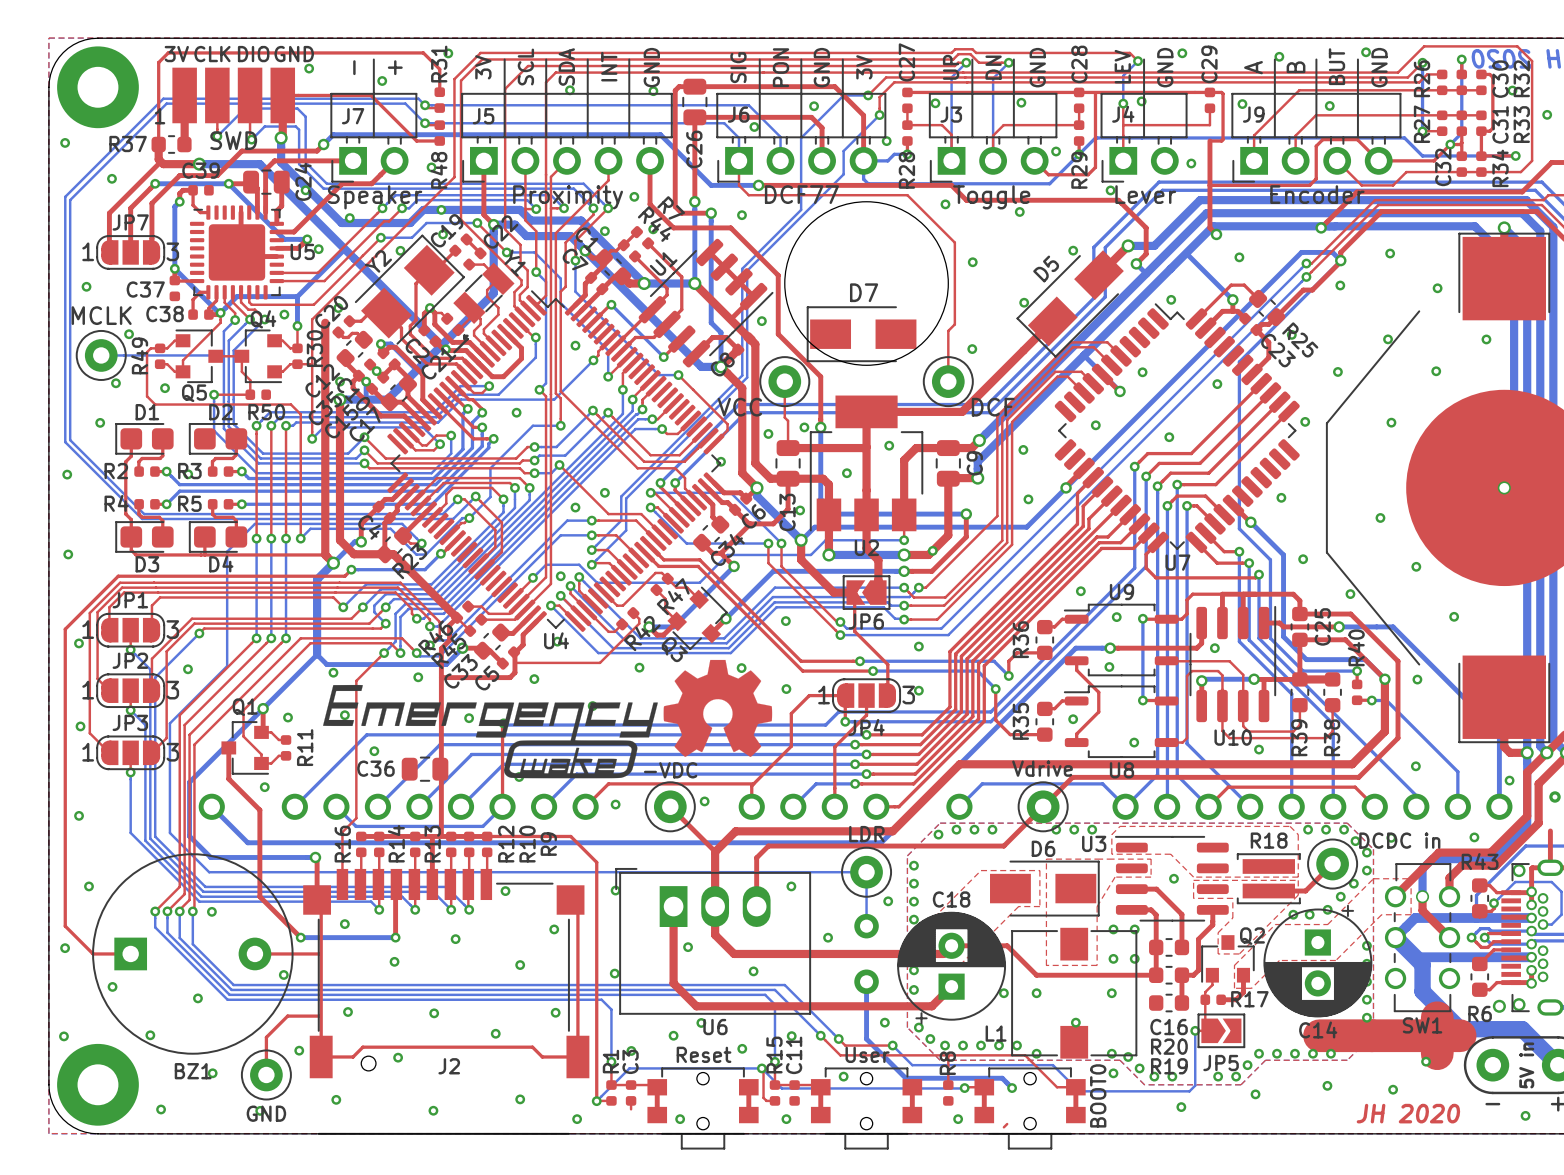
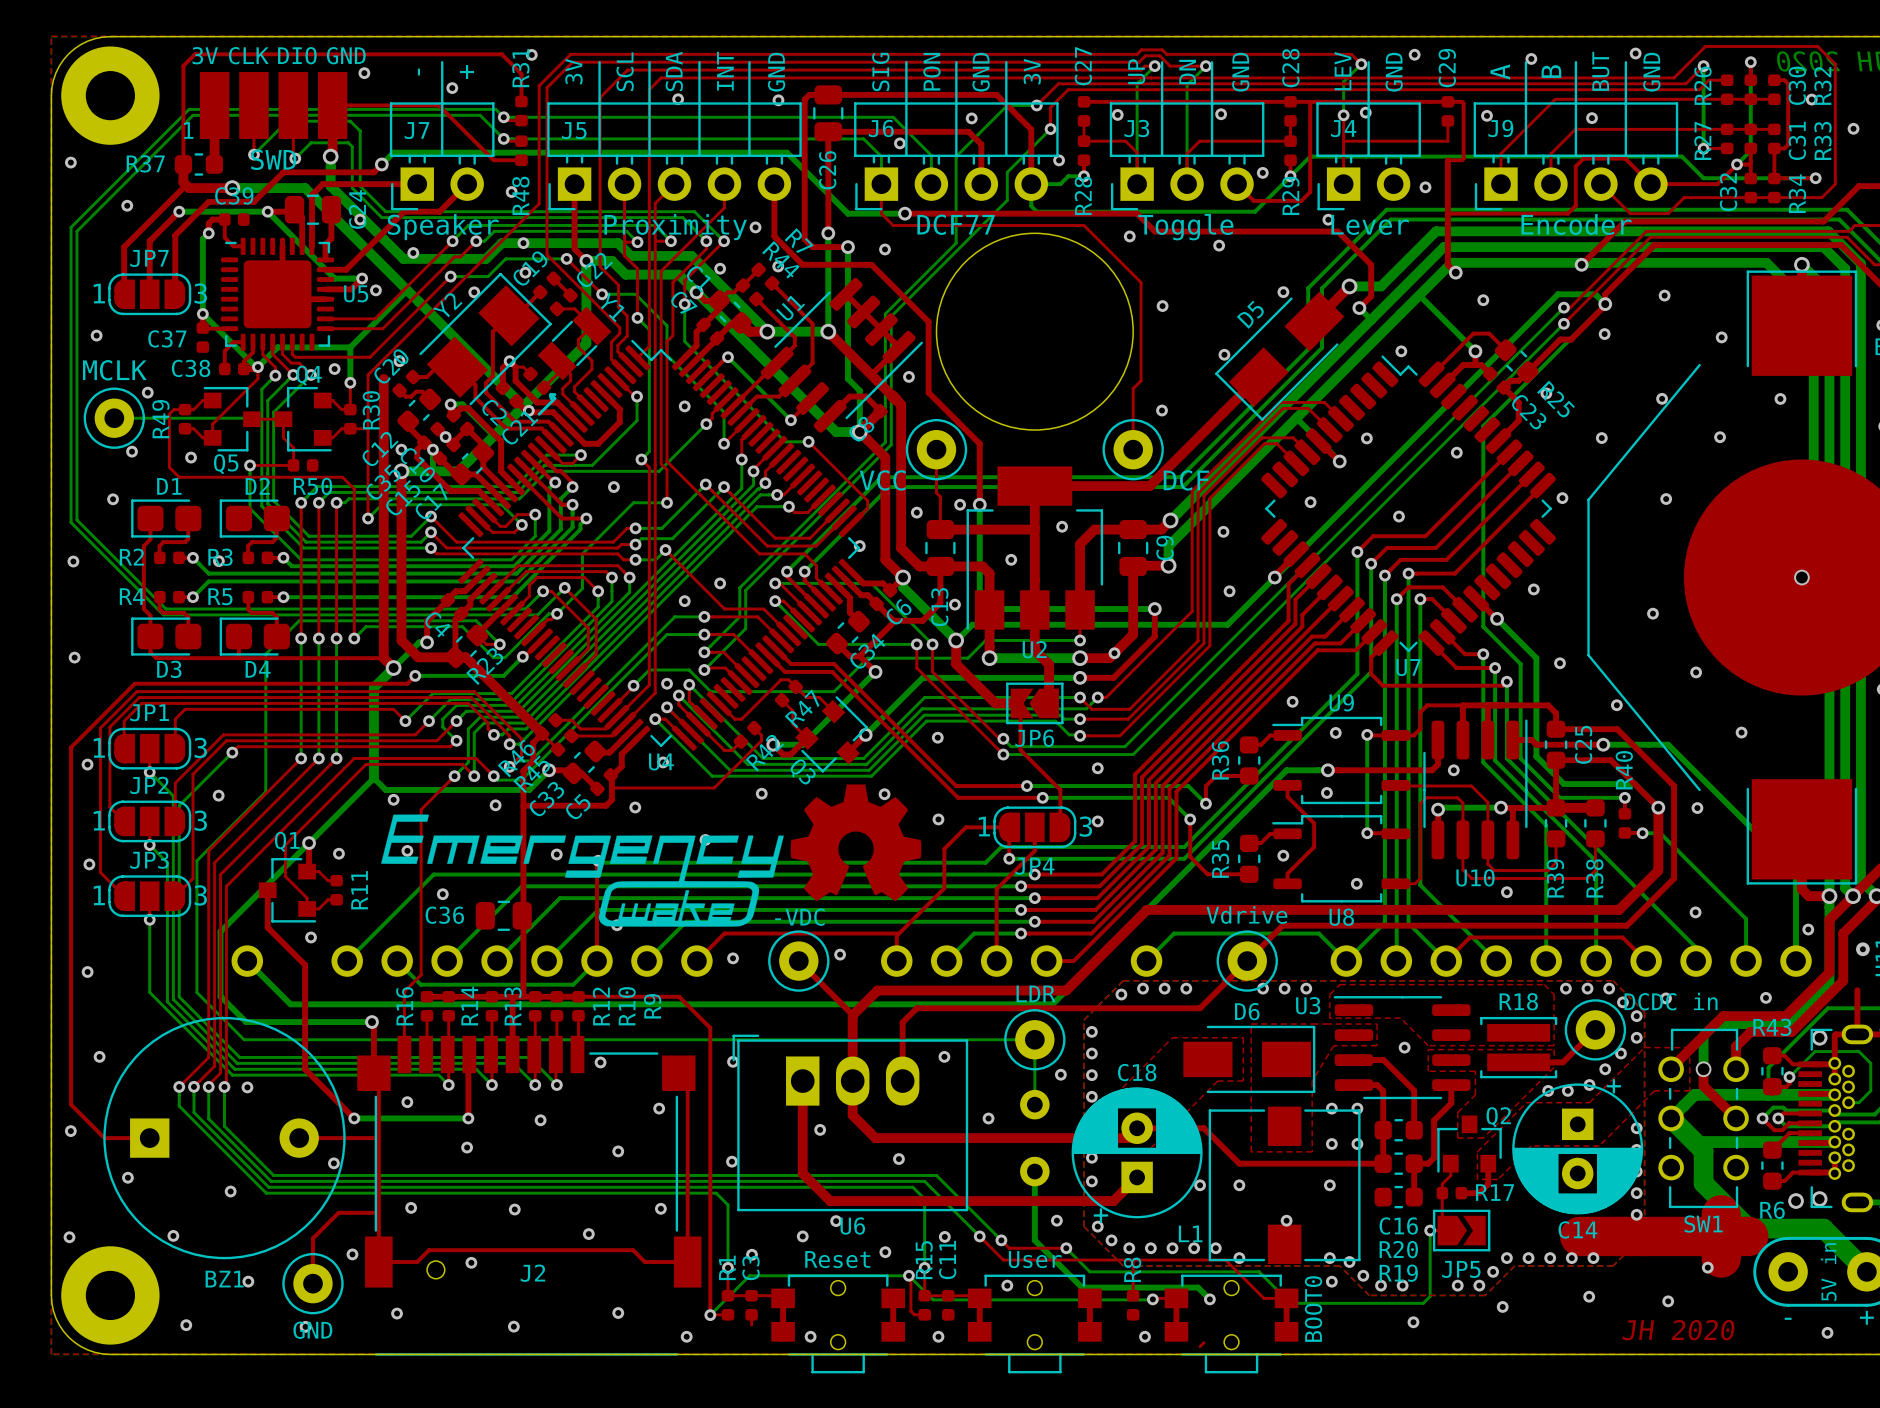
D7: (861, 334) -> none

